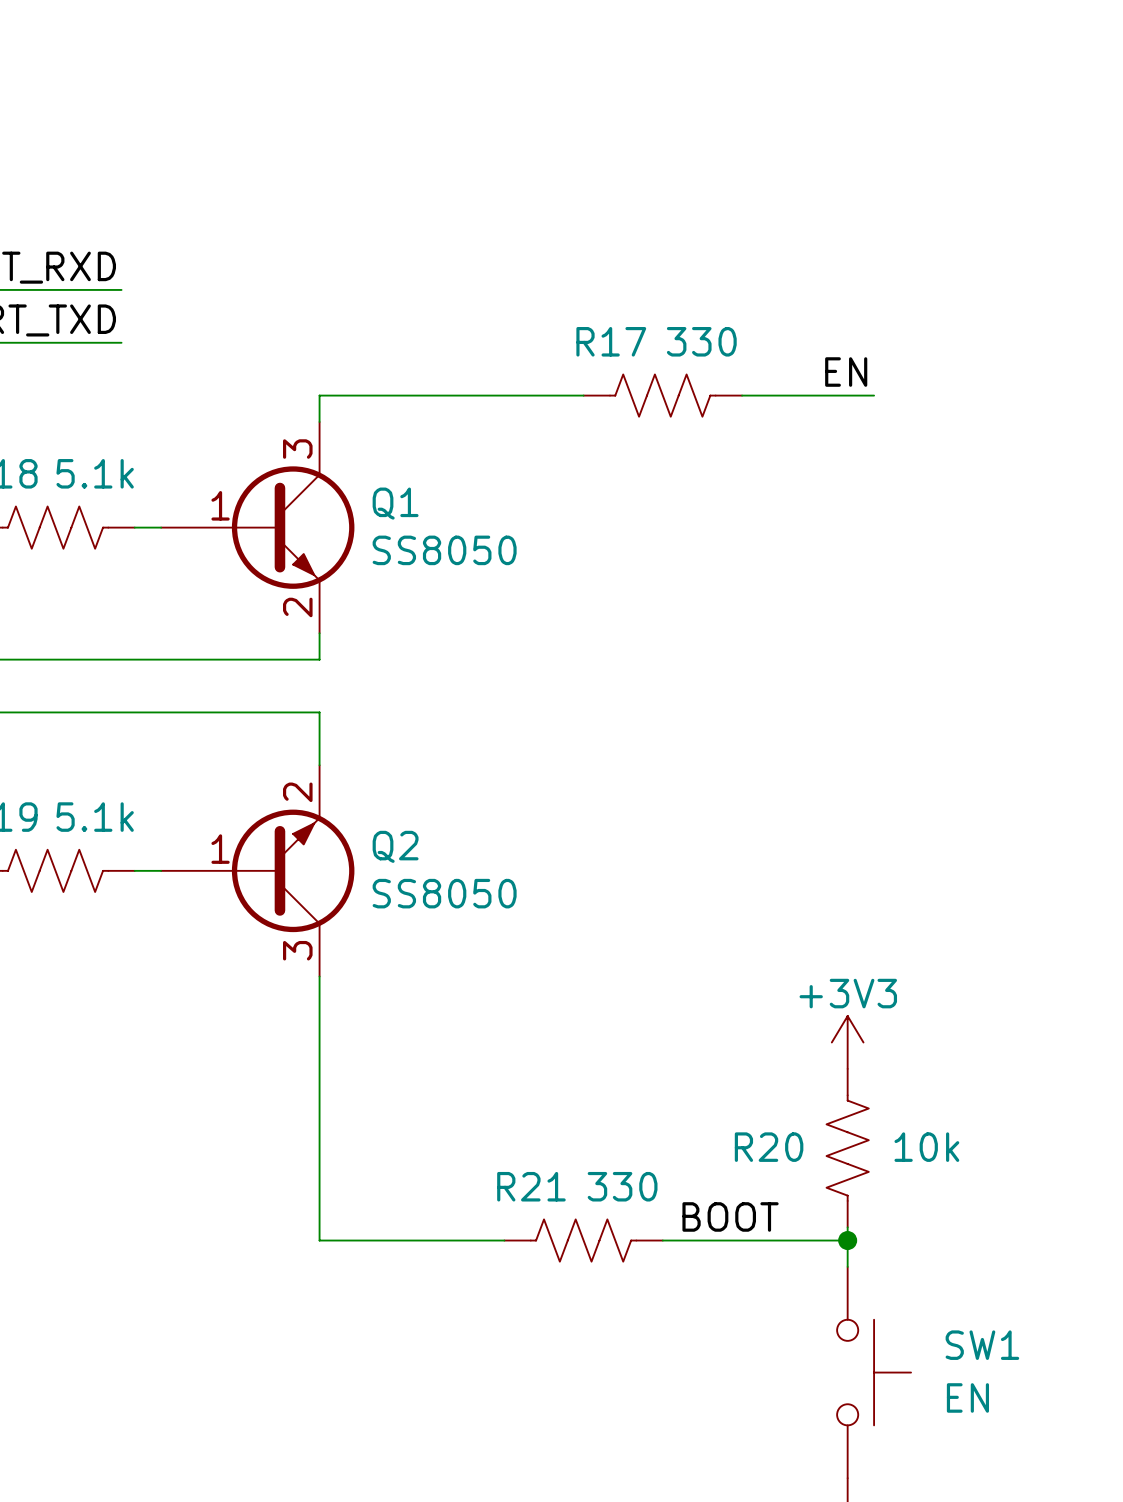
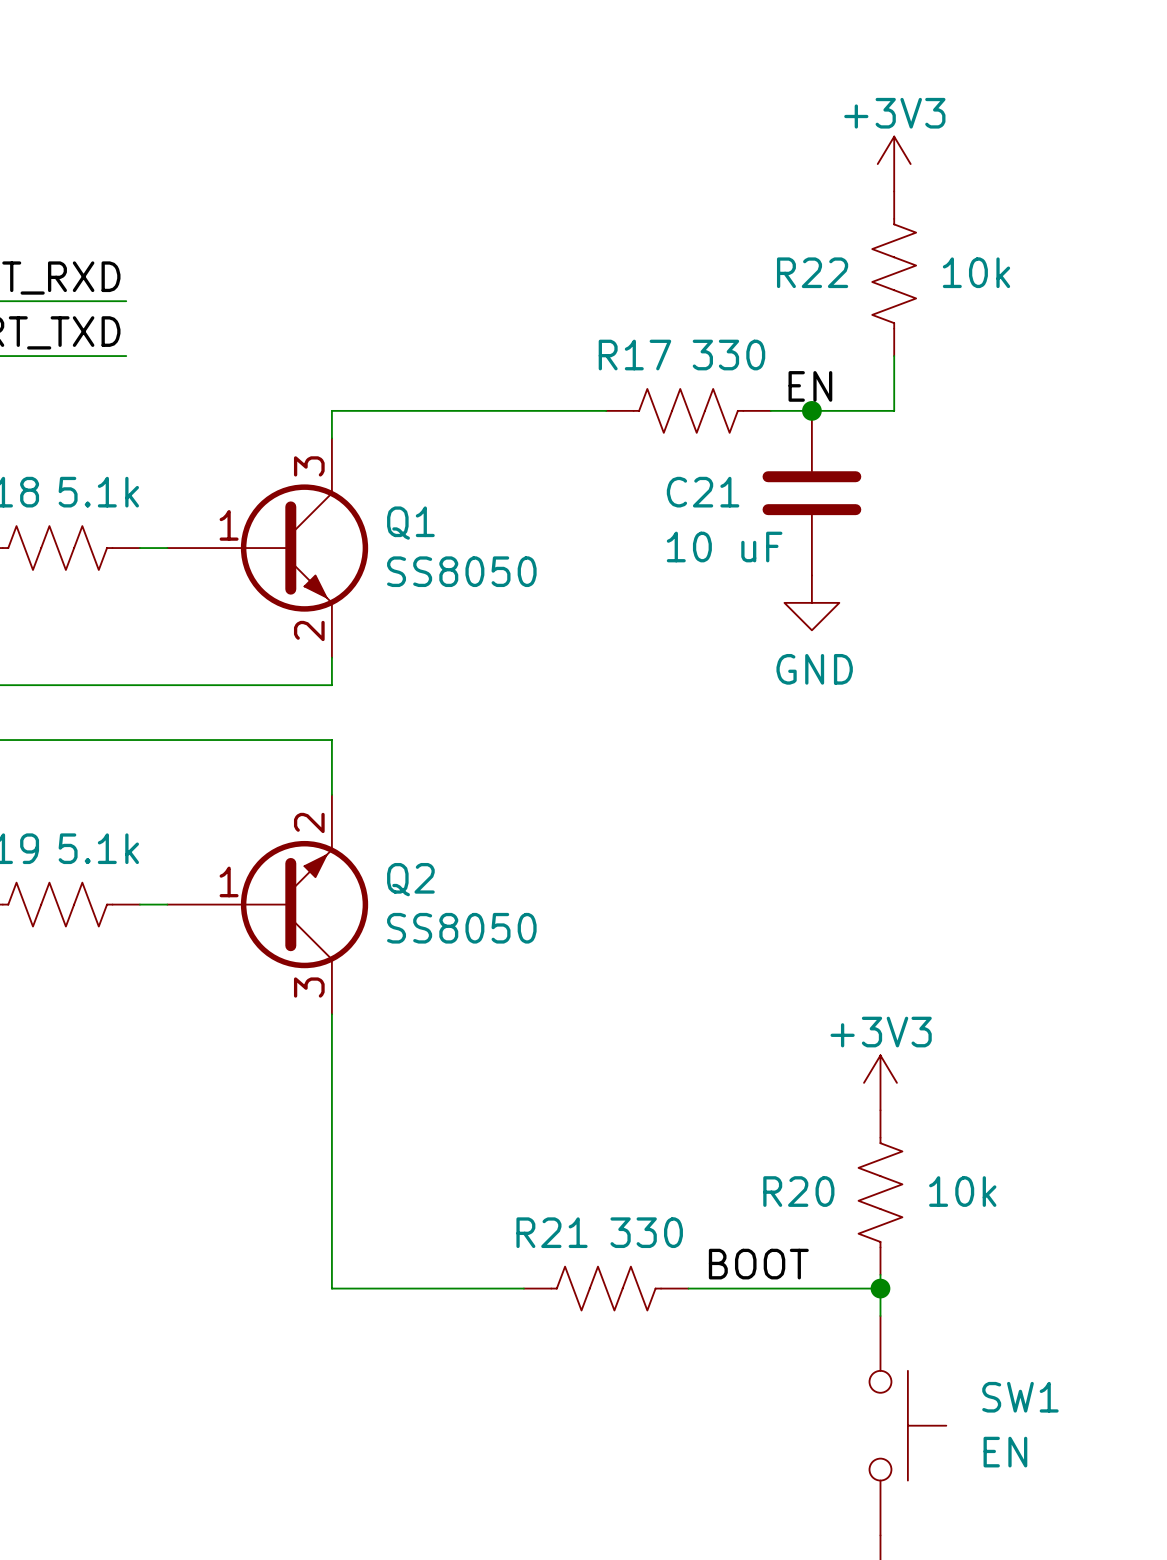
power symbol: none -> +3V3 (894, 164)
R22: none -> 10k (894, 273)
label position: EN (846, 372) -> EN (810, 386)
junction: none -> (811, 410)
wire: (860, 395) (874, 395) -> (894, 410) (894, 356)
C21: none -> 10 uF (811, 493)
power symbol: none -> GND (811, 602)

